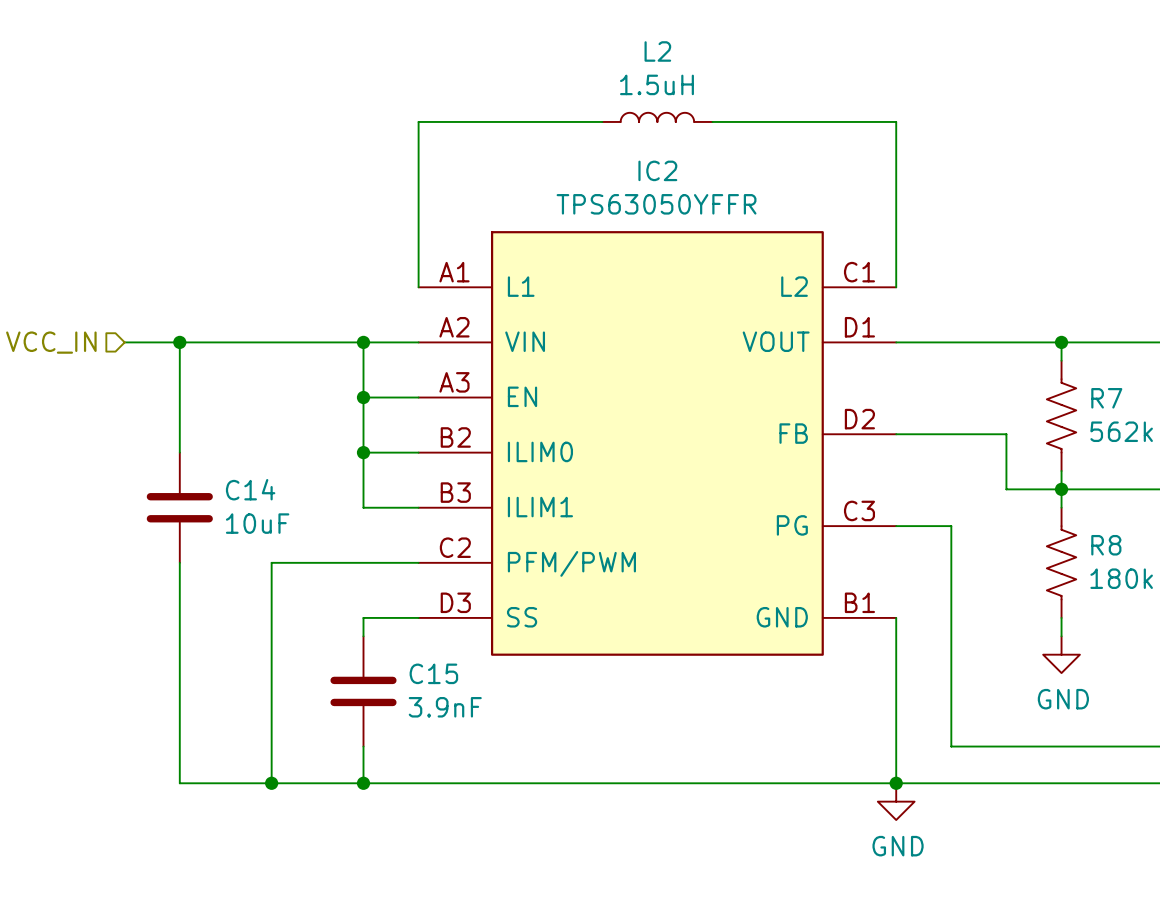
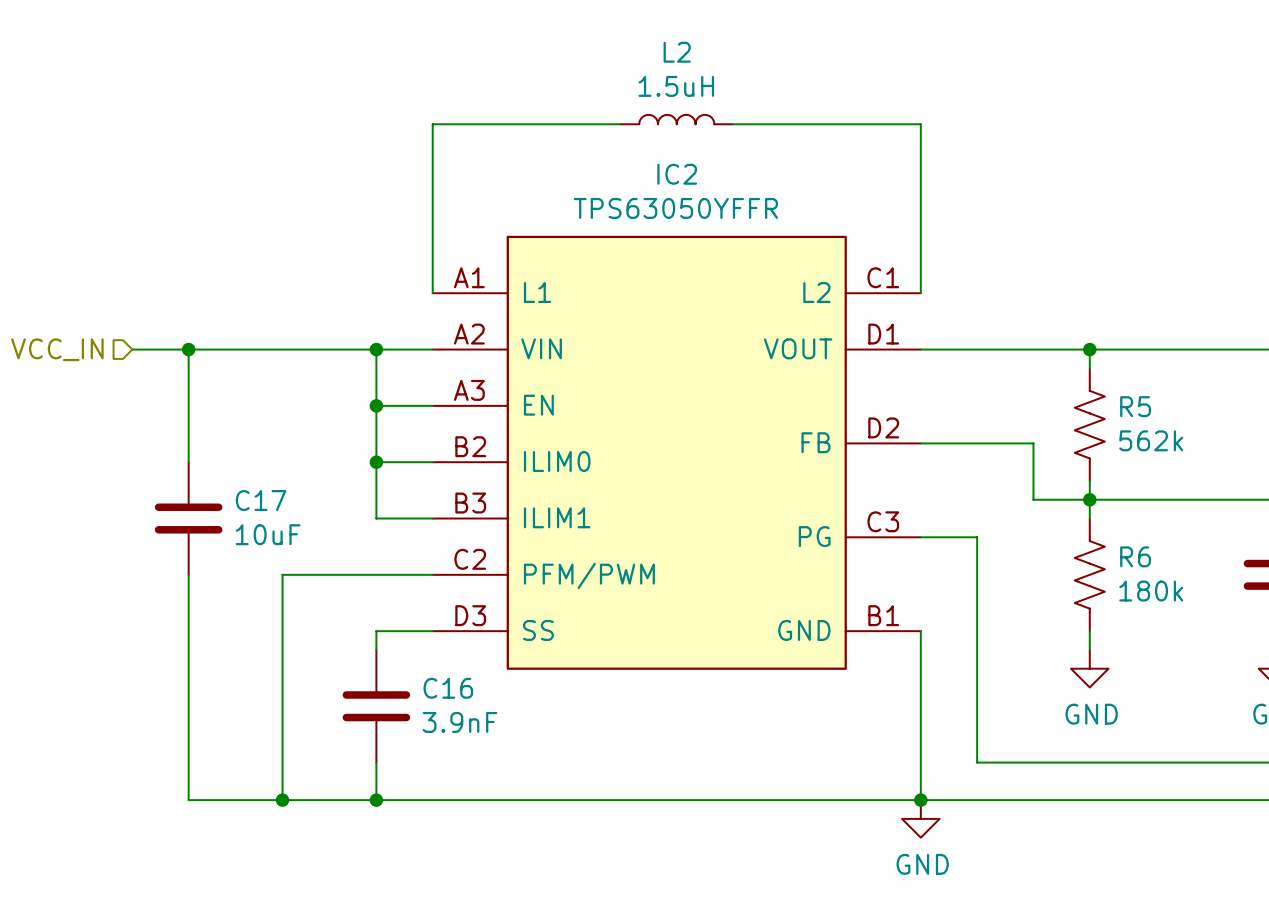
R7 name: R7 (1106, 398) -> R5 (1135, 406)
C14 name: C14 (250, 489) -> C17 (261, 500)
R8 name: R8 (1106, 545) -> R6 (1135, 556)
C15 name: C15 (433, 673) -> C16 (448, 688)

